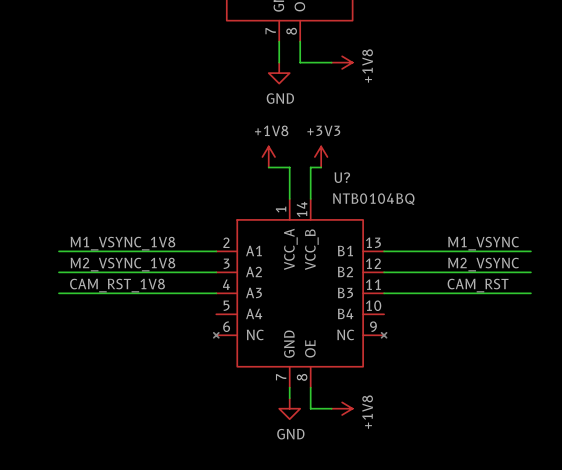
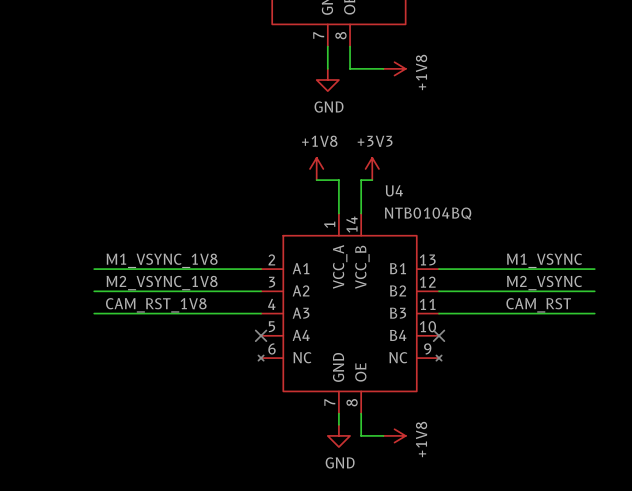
U? name: U? (342, 177) -> U4 (394, 190)
no-connect mark: none -> (261, 335)
no-connect mark: none -> (439, 335)

